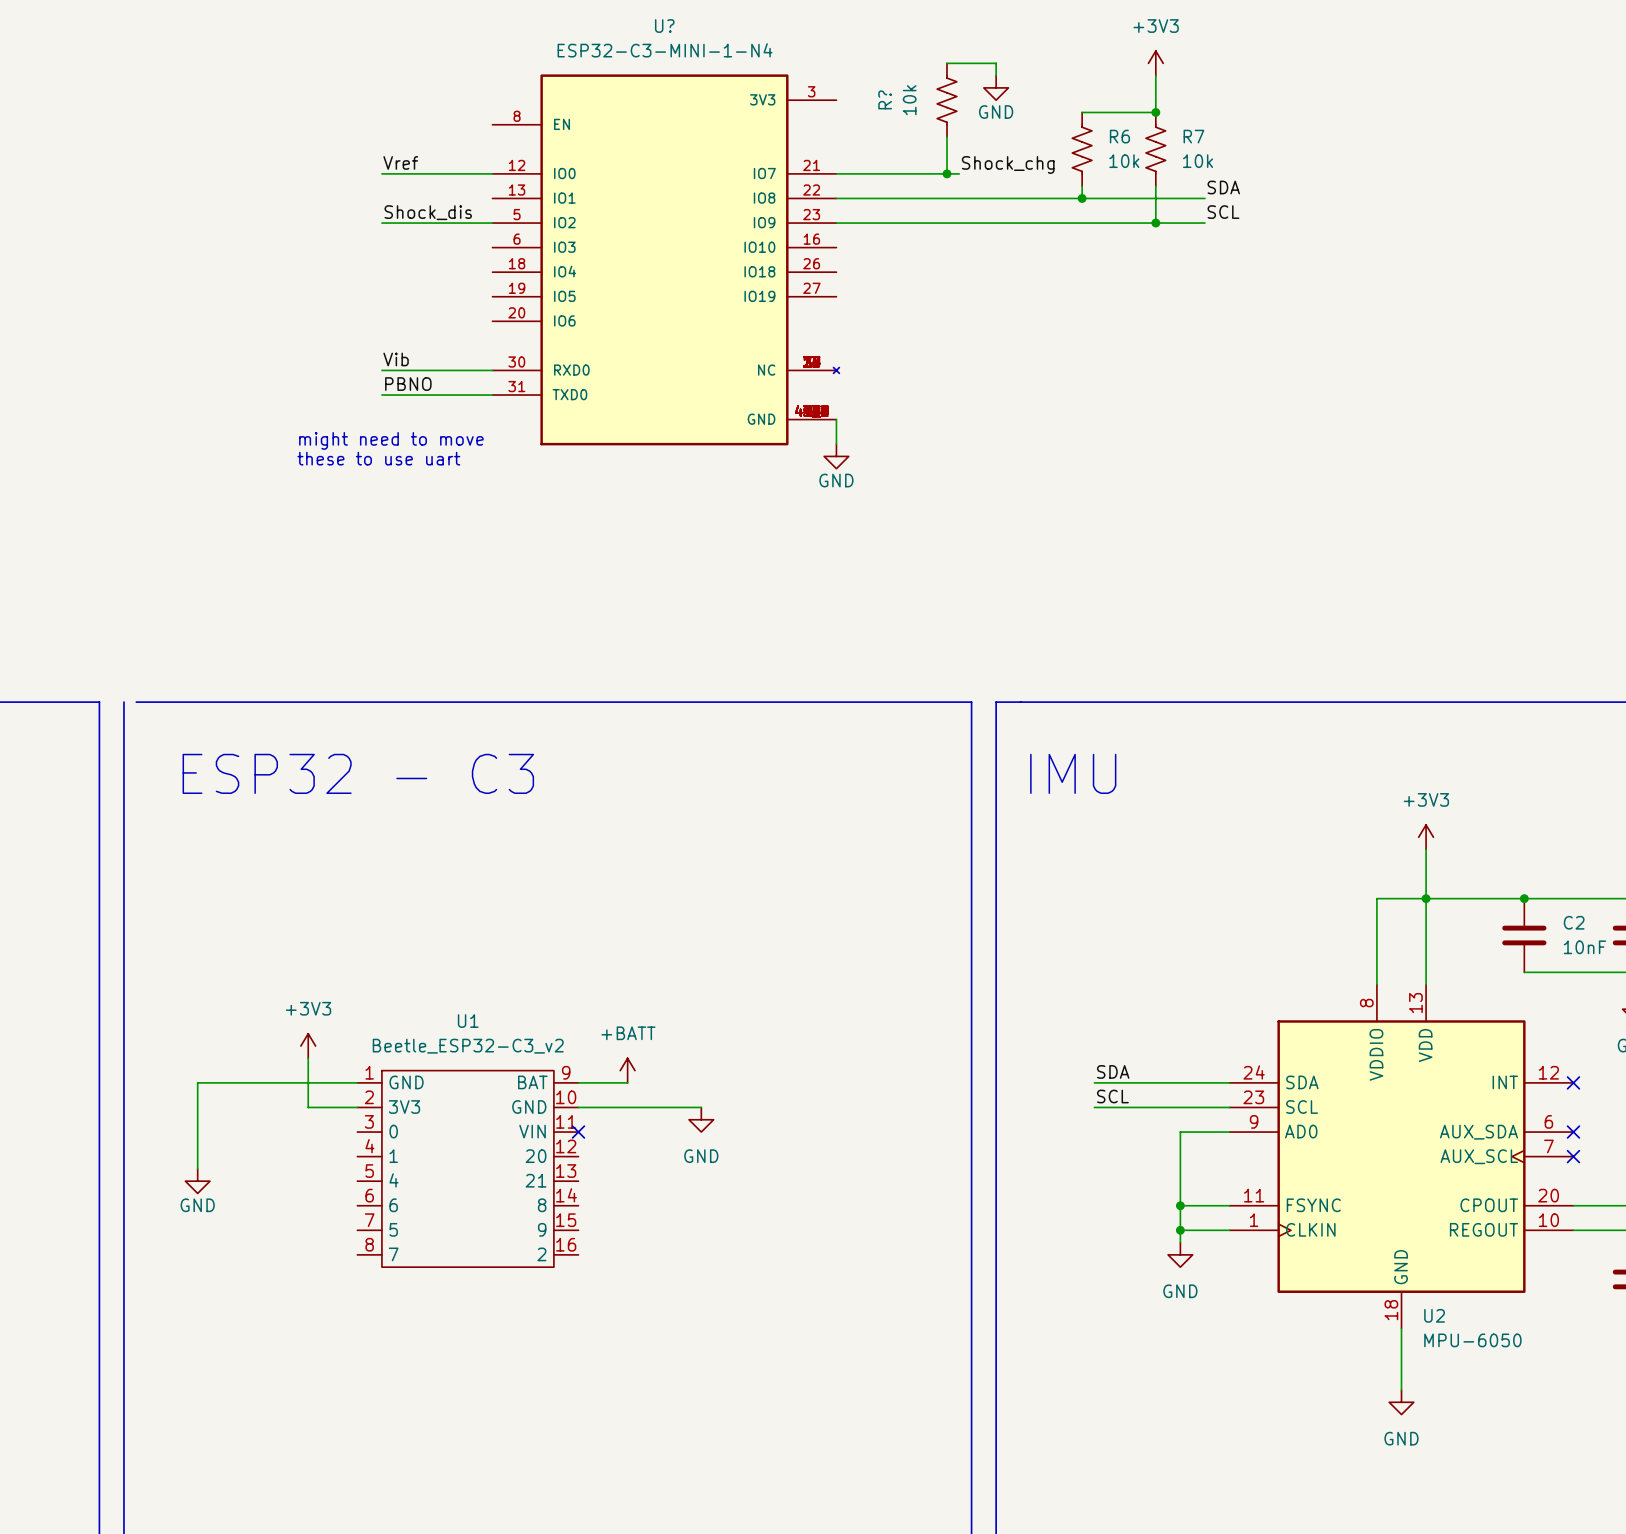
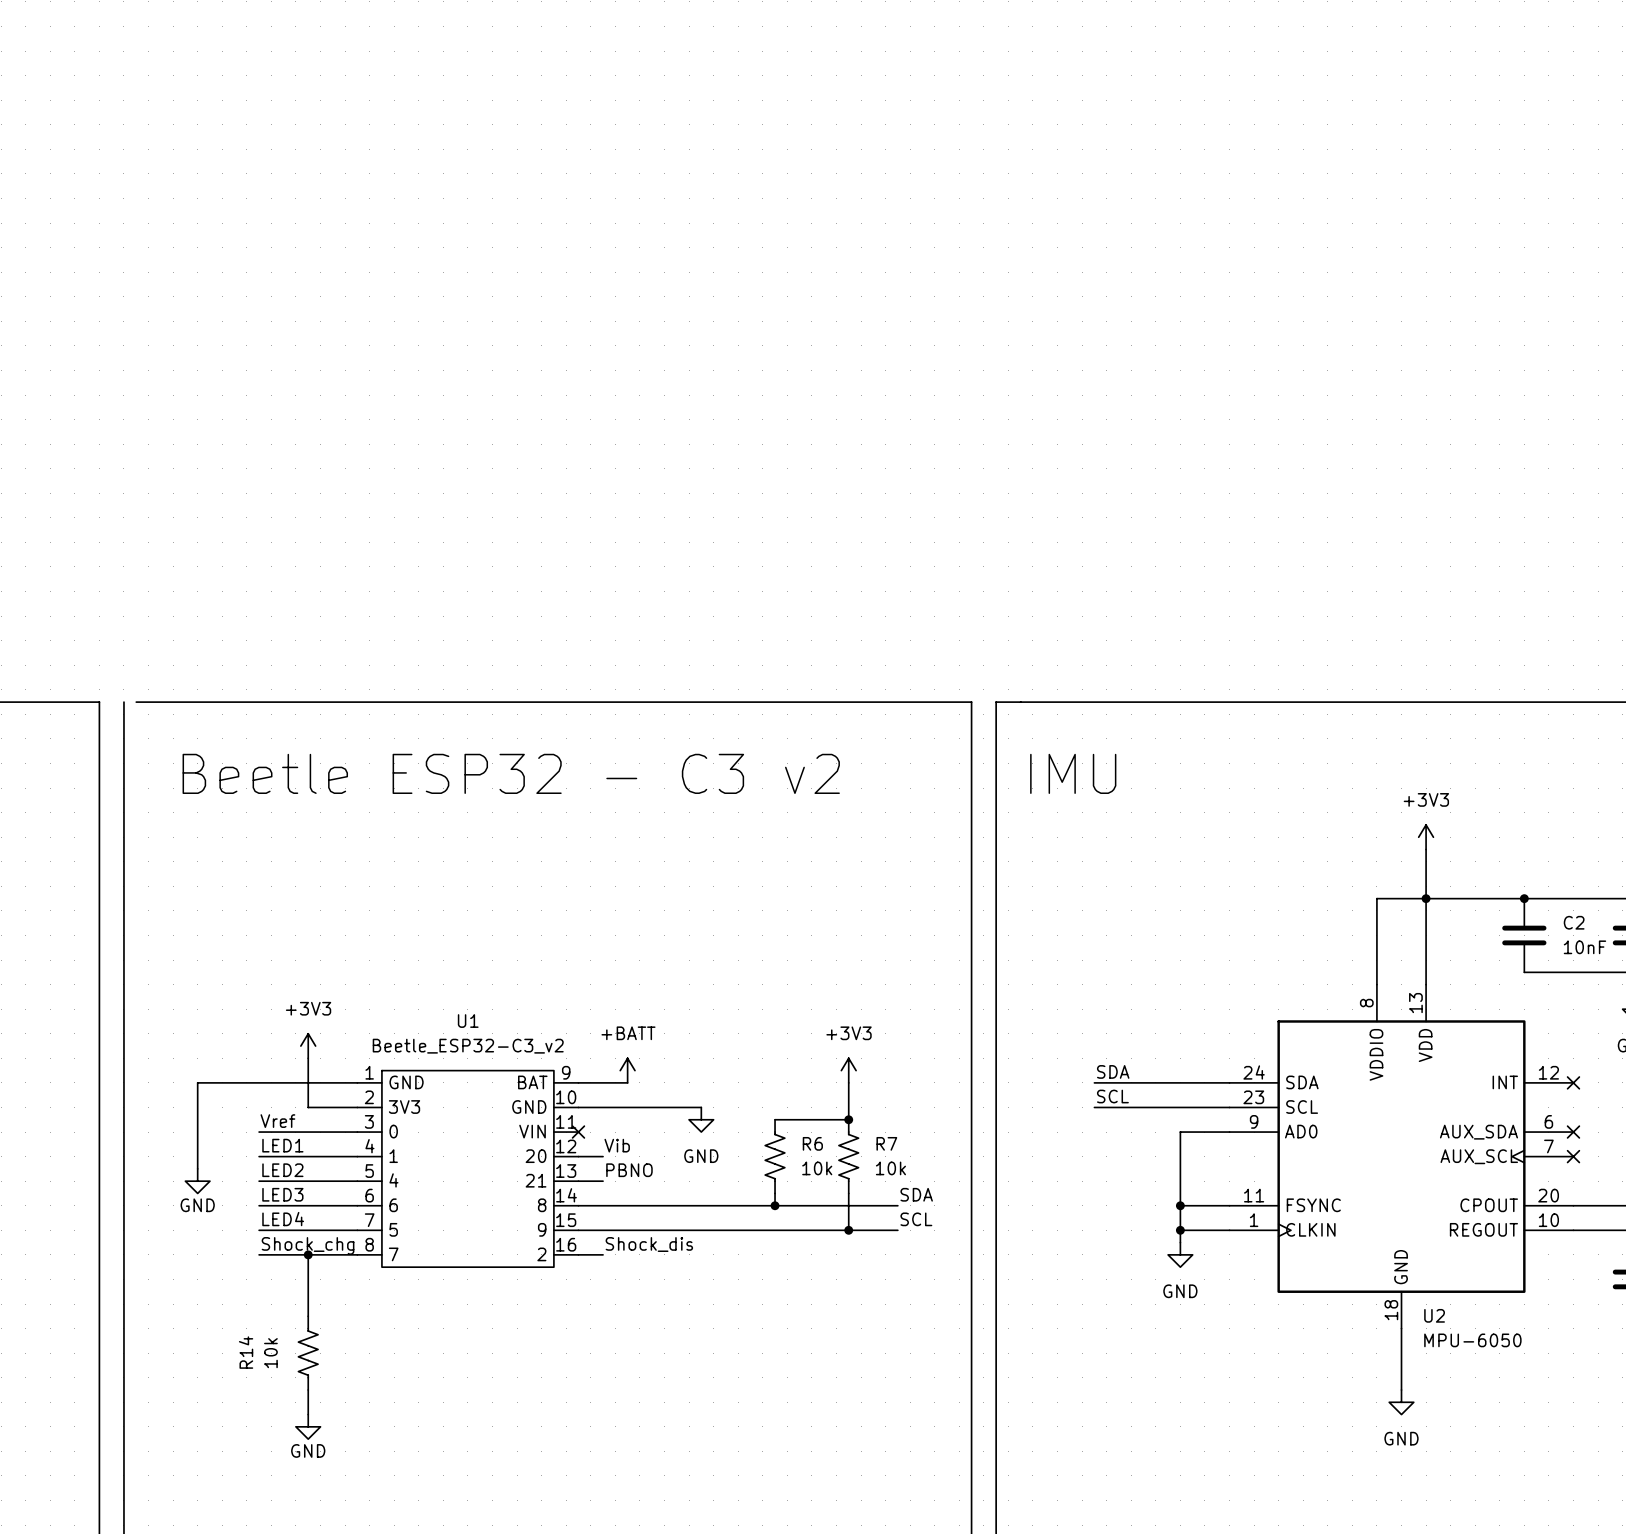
wire: (947, 63) (996, 63) (996, 75) -> none
power symbol: +3V3 (1155, 63) -> none
wire: (1155, 75) (1155, 112) (1082, 112) -> none
power symbol: GND (996, 87) -> none
R?: 10k (947, 100) -> none
junction: (1155, 112) -> none
wire: (947, 137) (947, 173) -> none
R6 position: (1082, 149) -> (775, 1156)
R7 position: (1155, 149) -> (848, 1156)
label: Vref (400, 162) -> none
label: Shock_chg (1008, 164) -> none
wire: (381, 173) (492, 173) -> none
wire: (836, 173) (959, 173) -> none
junction: (947, 173) -> none
wire: (1082, 186) (1082, 198) -> none
wire: (1155, 186) (1155, 223) -> none
label: SDA (1223, 187) -> none
wire: (836, 198) (1204, 198) -> none
junction: (1082, 198) -> none
label: Shock_dis (428, 212) -> none
label: SCL (1223, 212) -> none
wire: (381, 223) (492, 223) -> none
wire: (836, 223) (1204, 223) -> none
junction: (1155, 223) -> none
U?: ESP32-C3-MINI-1-N4 (665, 259) -> none
label: Vib (396, 359) -> none
wire: (381, 370) (492, 370) -> none
label: PBNO (408, 384) -> none
wire: (381, 395) (492, 395) -> none
wire: (836, 419) (836, 444) -> none
text: might need to move (391, 440) -> none
power symbol: GND (836, 456) -> none
text: these to use uart (378, 458) -> none
text: ESP32 - C3 (358, 773) -> Beetle ESP32 - C3 v2 (511, 773)
power symbol: none -> +3V3 (848, 1070)
wire: none -> (848, 1082) (848, 1119) (775, 1119)
junction: none -> (848, 1119)
label: none -> Vref (277, 1121)
wire: none -> (259, 1132) (357, 1132)
label: none -> LED1 (282, 1145)
label: none -> Vib (617, 1145)
wire: none -> (259, 1156) (357, 1156)
wire: none -> (578, 1156) (603, 1156)
label: none -> LED2 (282, 1170)
label: none -> PBNO (629, 1170)
wire: none -> (259, 1181) (357, 1181)
wire: none -> (578, 1181) (603, 1181)
wire: none -> (775, 1193) (775, 1205)
wire: none -> (848, 1193) (848, 1230)
label: none -> LED3 (282, 1194)
label: none -> SDA (916, 1194)
wire: none -> (259, 1205) (357, 1205)
wire: none -> (578, 1205) (897, 1205)
junction: none -> (775, 1205)
label: none -> LED4 (283, 1219)
label: none -> SCL (916, 1219)
wire: none -> (259, 1230) (357, 1230)
wire: none -> (578, 1230) (897, 1230)
junction: none -> (848, 1230)
label: none -> Shock_dis (649, 1244)
label: none -> Shock_chg (308, 1245)
wire: none -> (259, 1254) (357, 1254)
wire: none -> (308, 1254) (308, 1316)
junction: none -> (308, 1254)
wire: none -> (578, 1254) (603, 1254)
R14: none -> 10k (308, 1353)
wire: none -> (308, 1390) (308, 1414)
power symbol: none -> GND (308, 1426)

